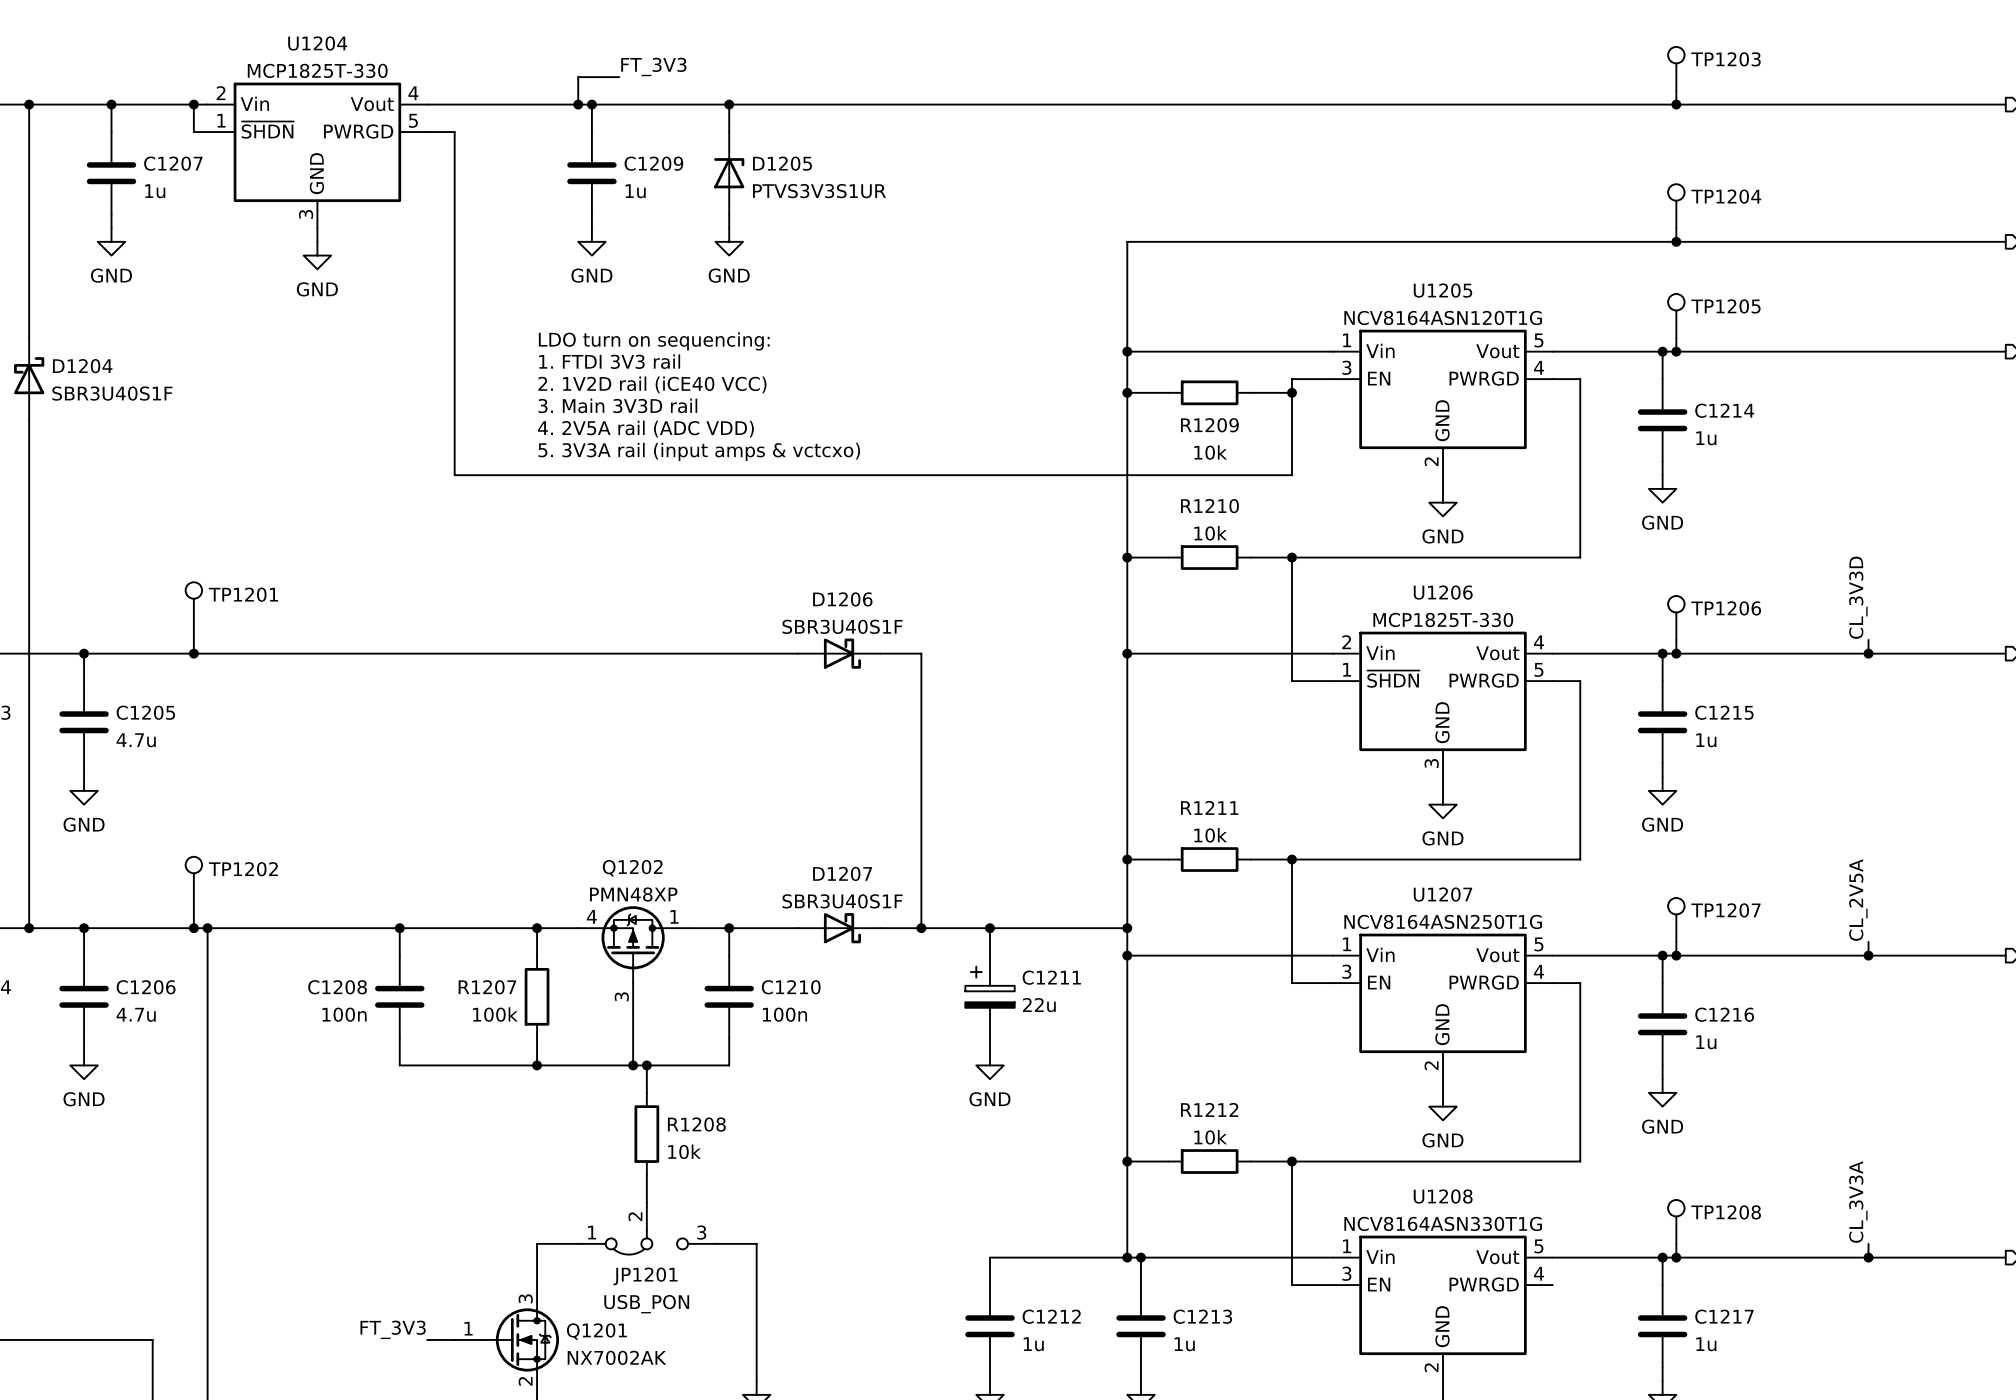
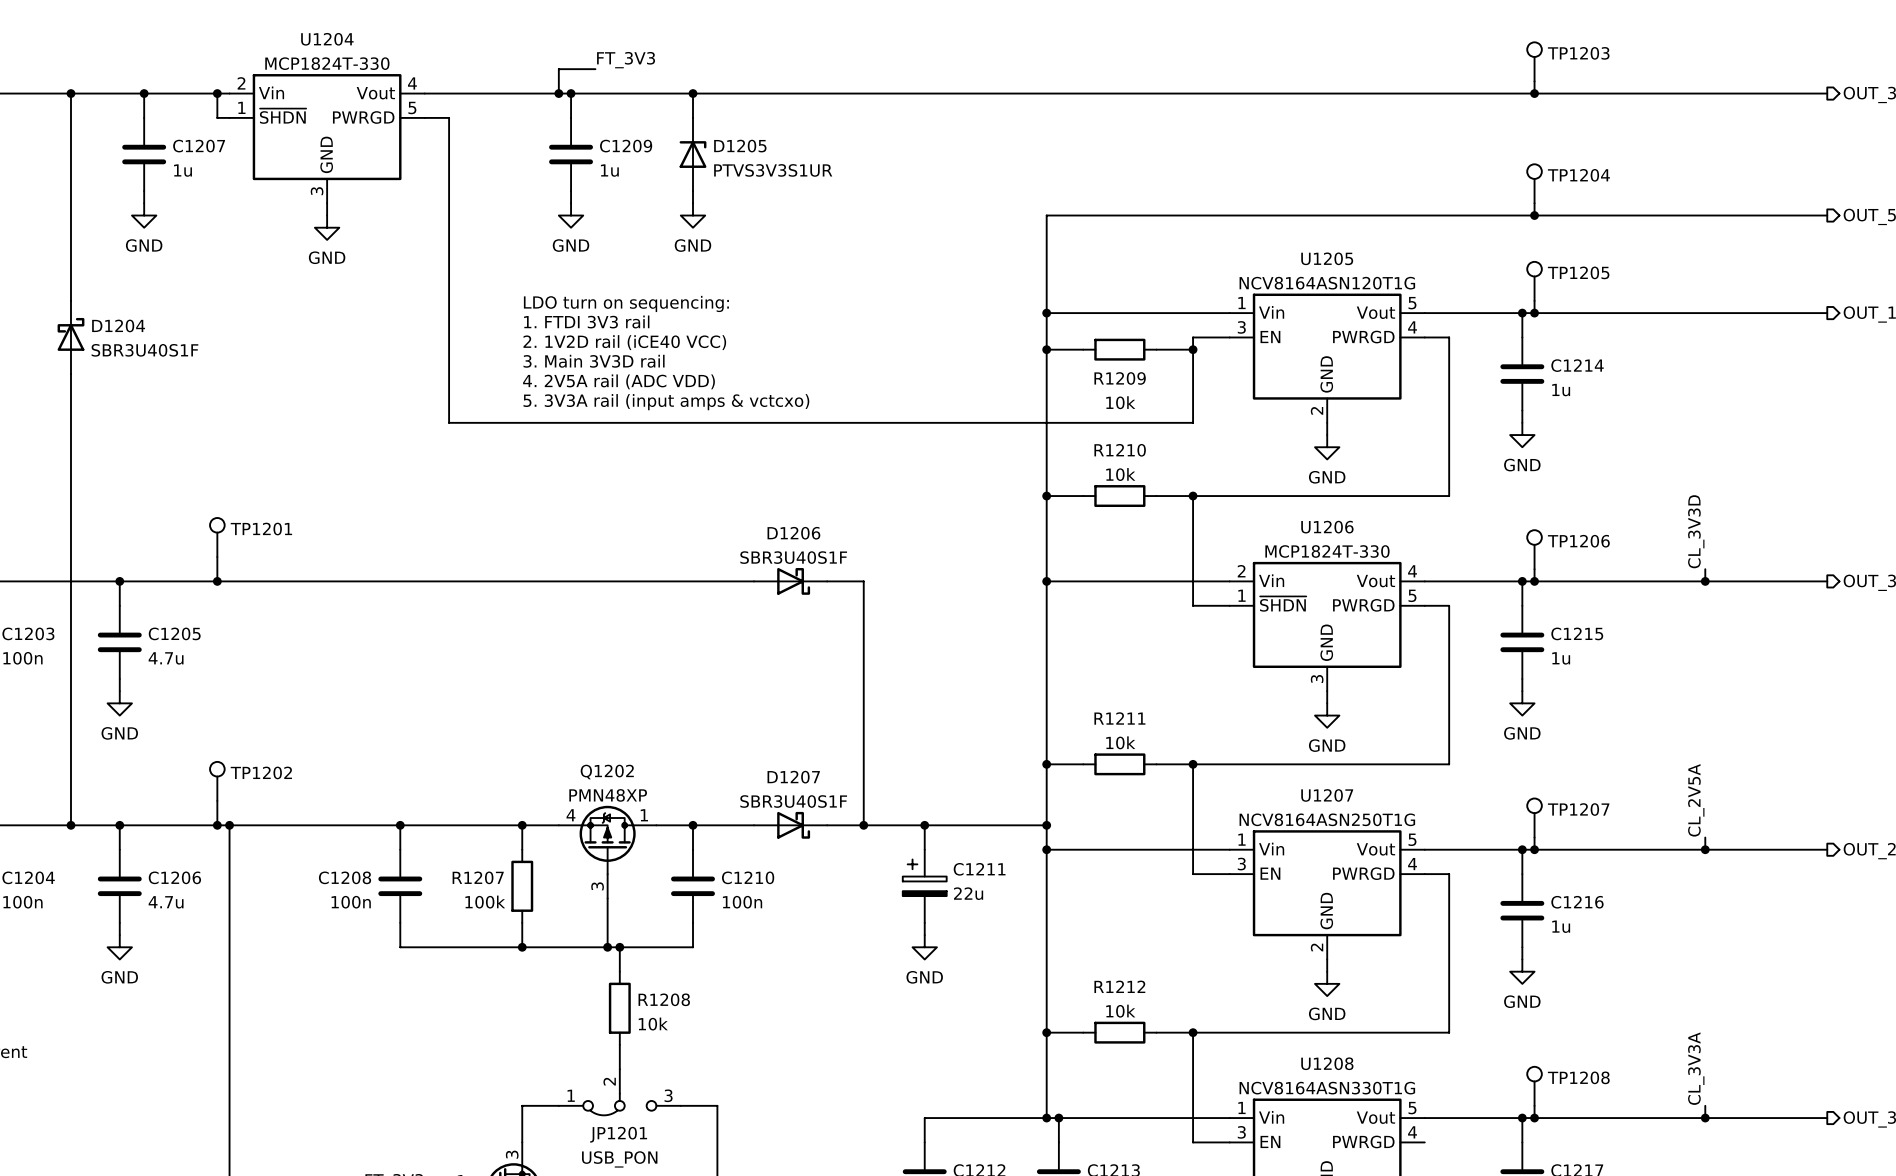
U1204 value: MCP1825T-330 (317, 70) -> MCP1824T-330 (327, 63)
U1206 value: MCP1825T-330 (1443, 619) -> MCP1824T-330 (1327, 551)

